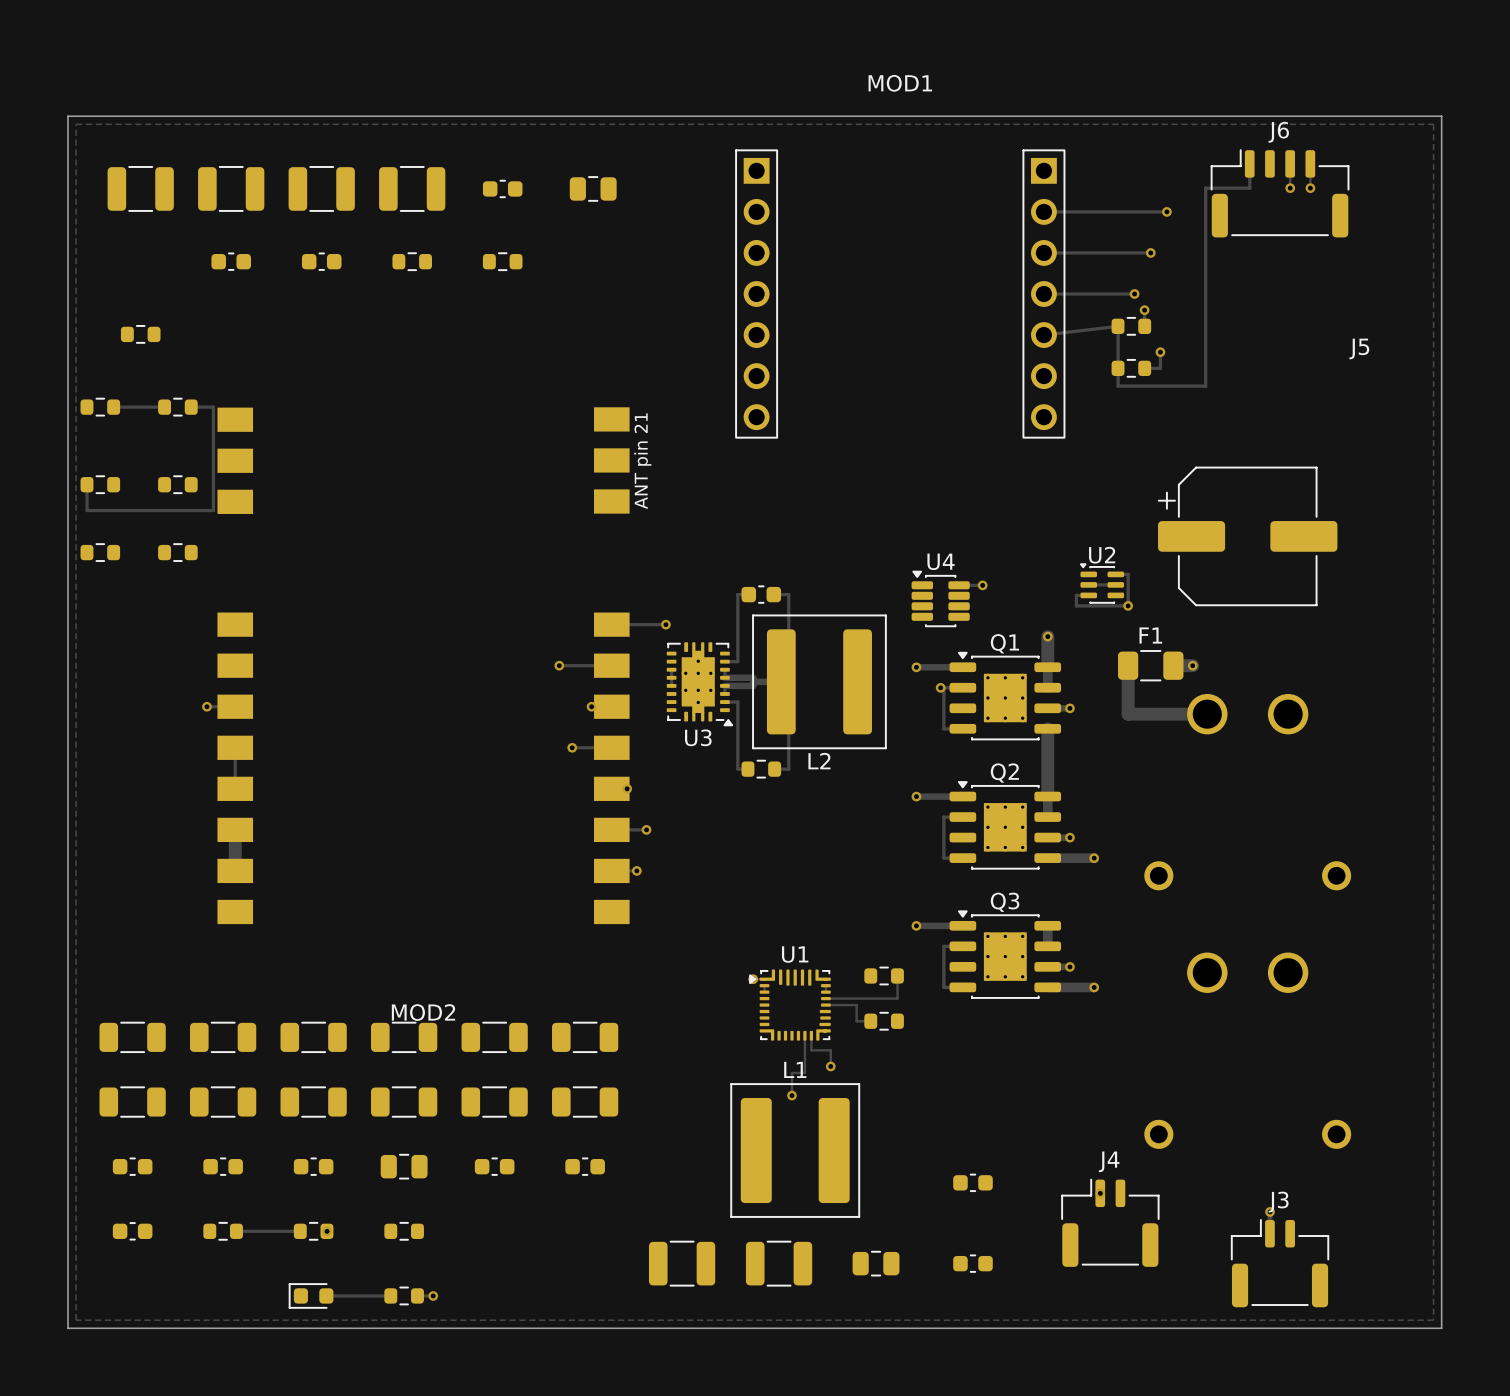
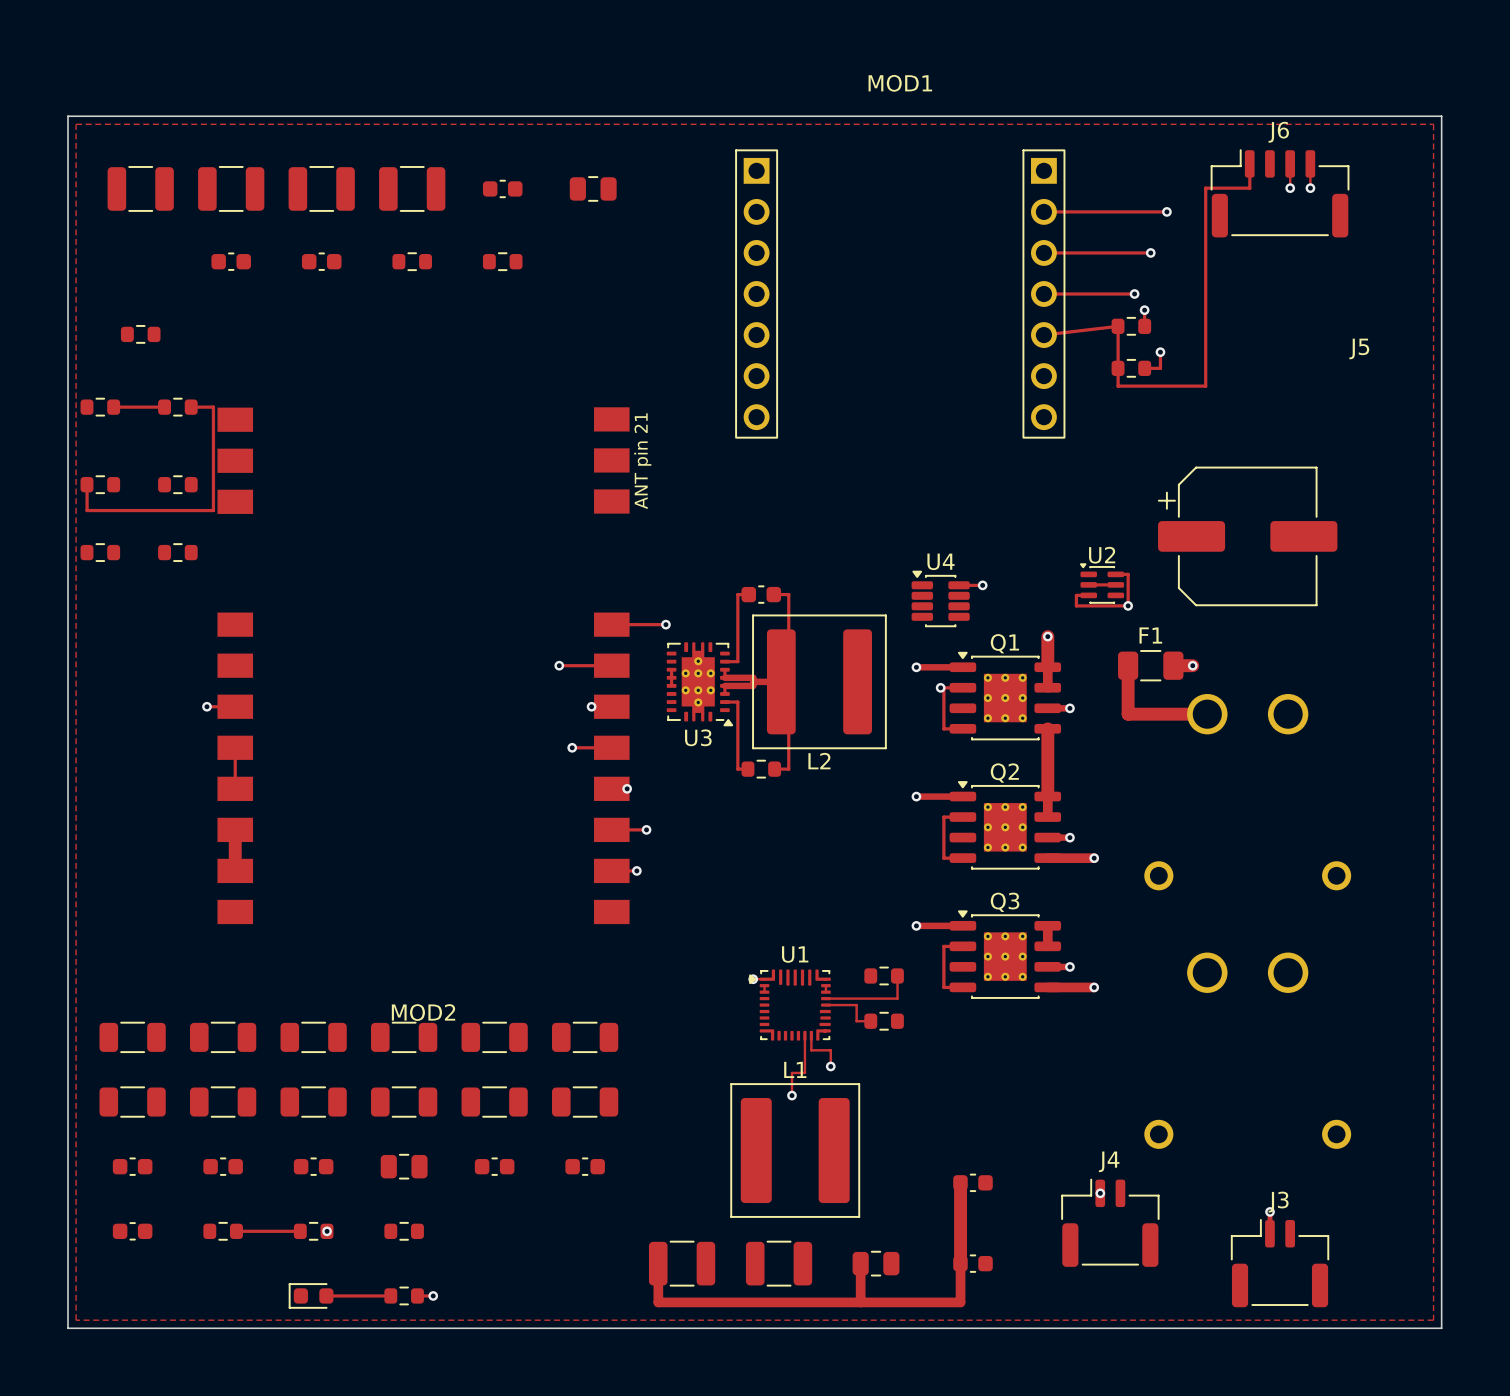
track: none -> (658, 1263) (658, 1302) (960, 1302) (960, 1182) (960, 1263)
track: none -> (860, 1263) (860, 1302)

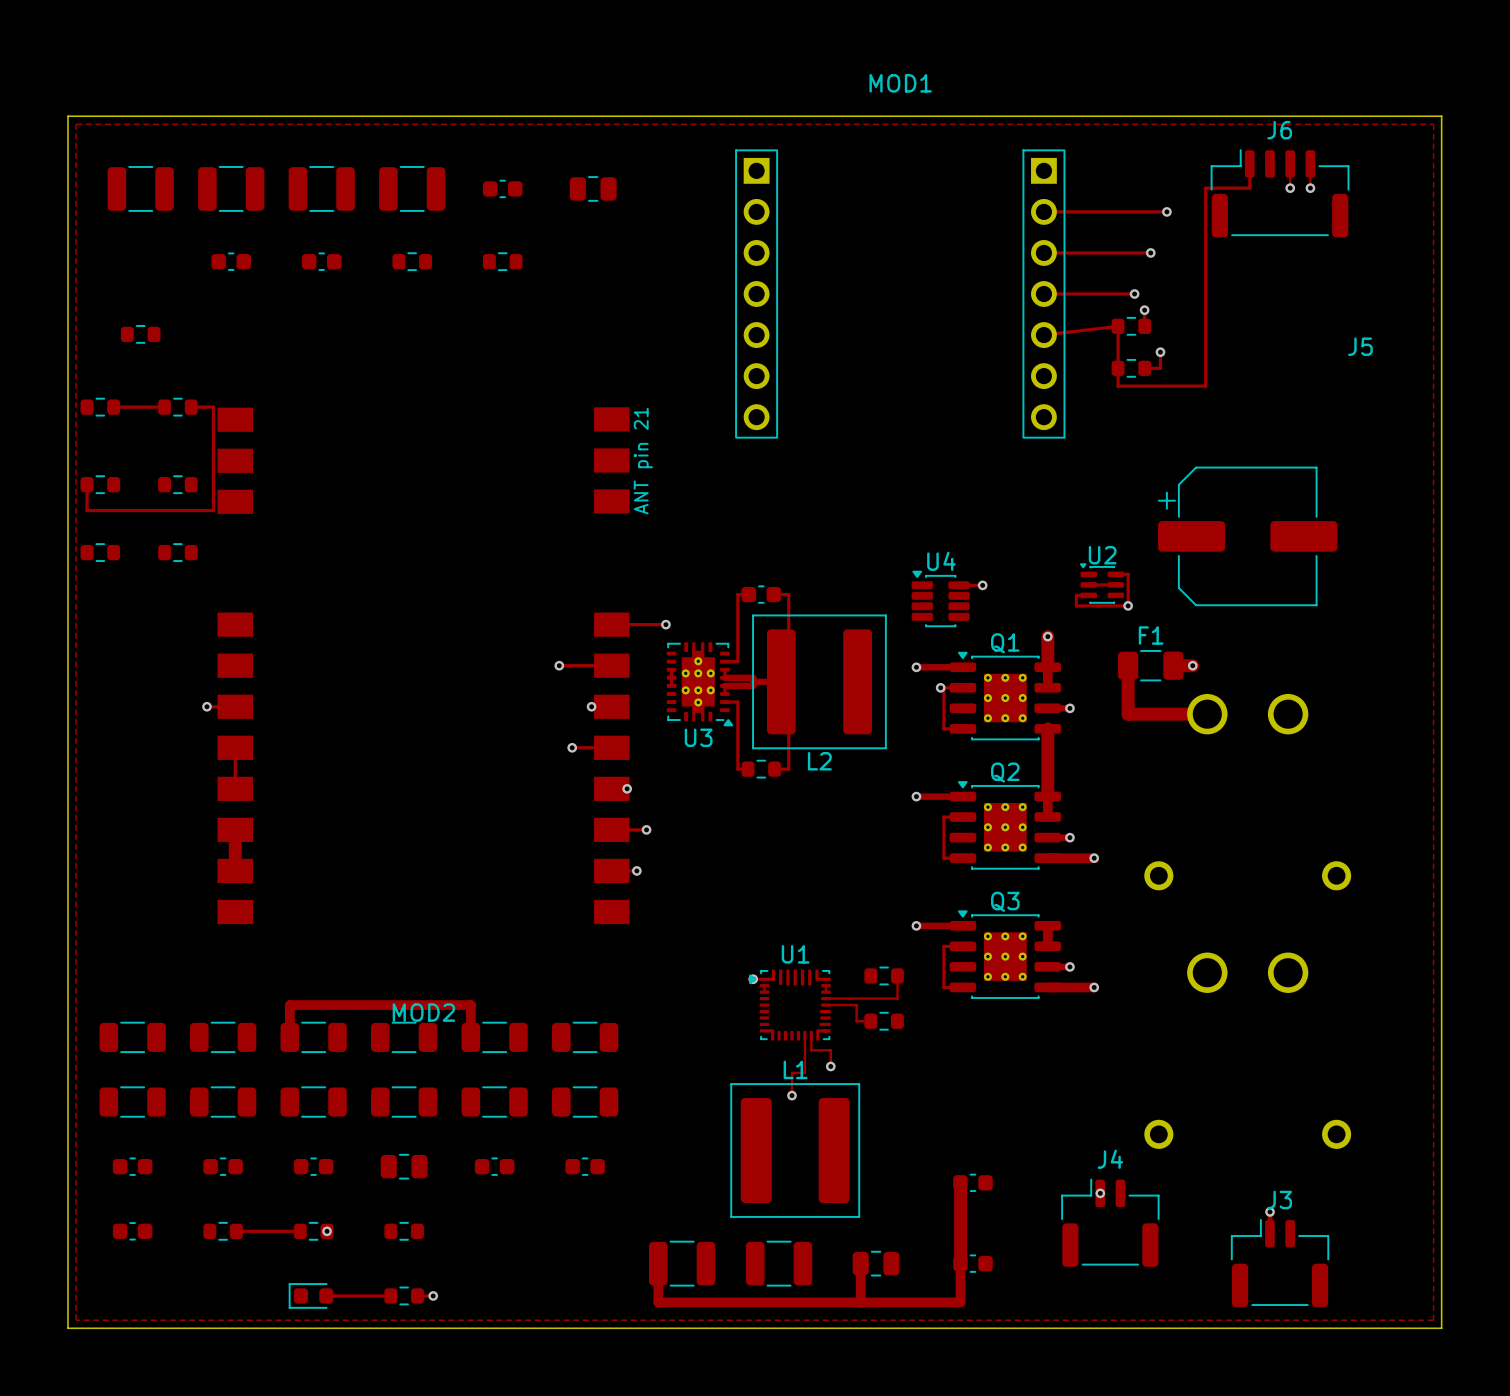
track: none -> (289, 1037) (289, 1005) (470, 1005) (470, 1037)

